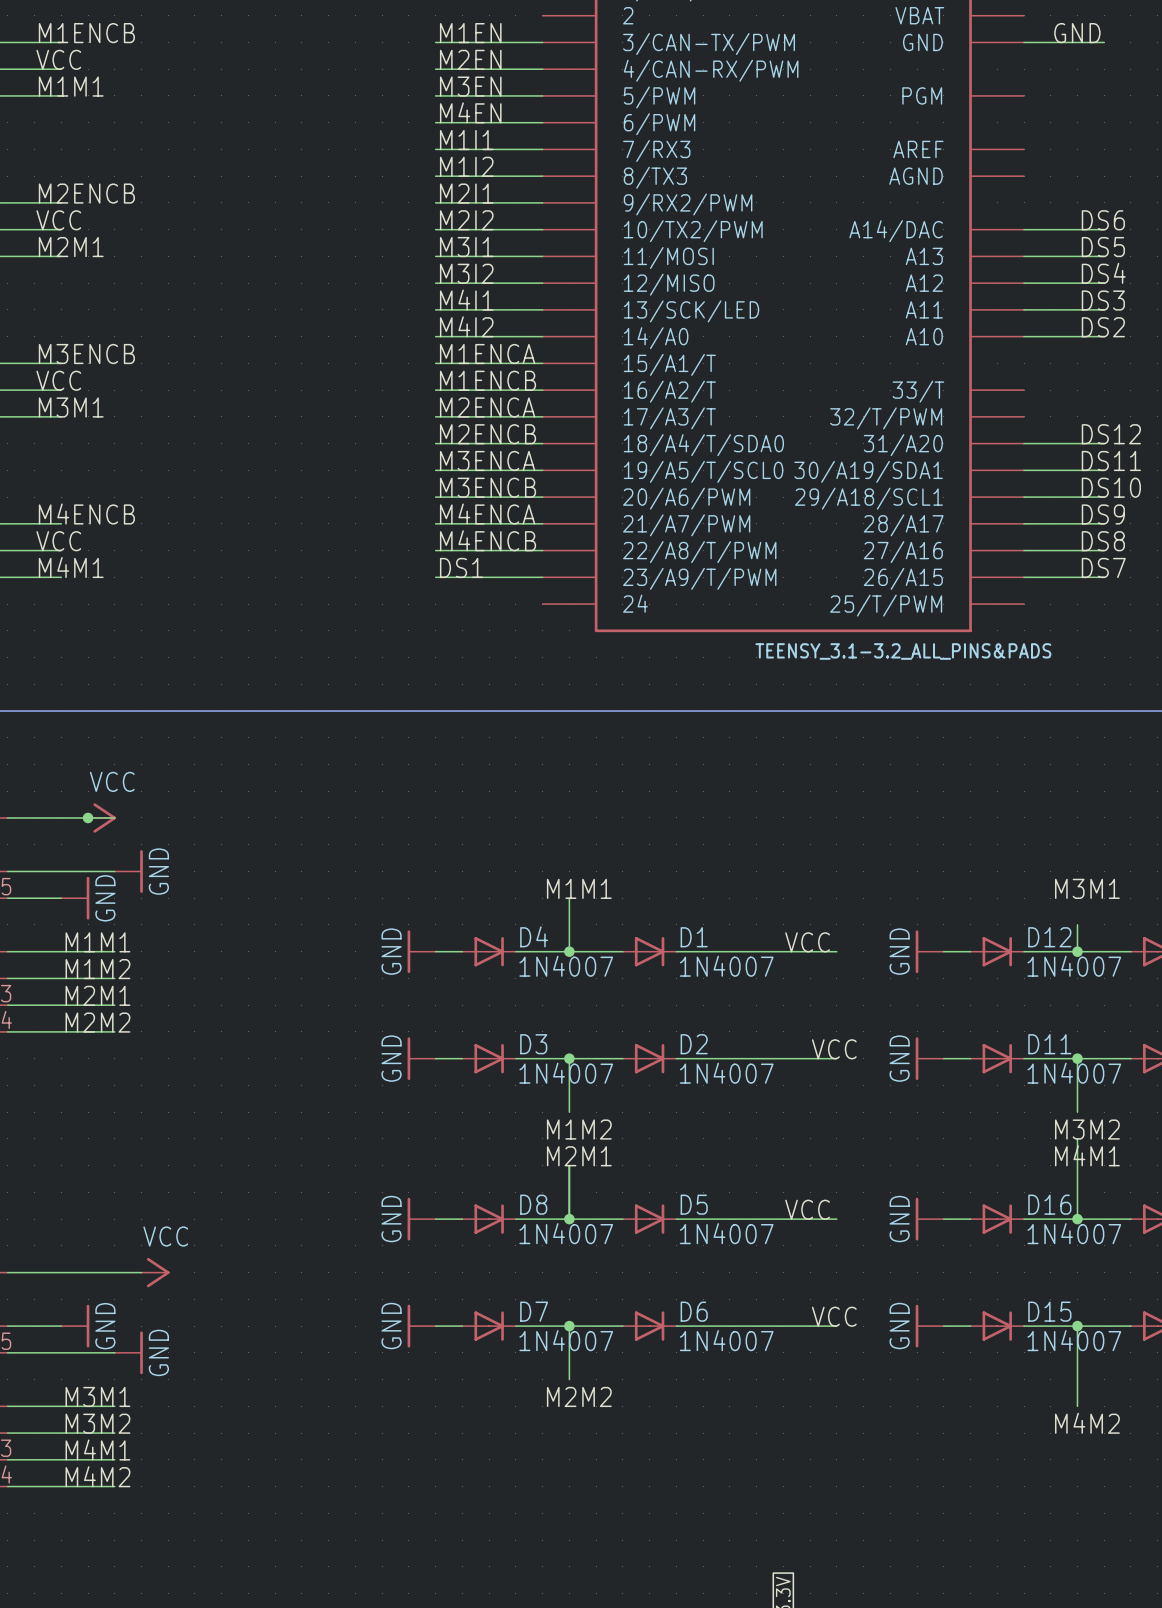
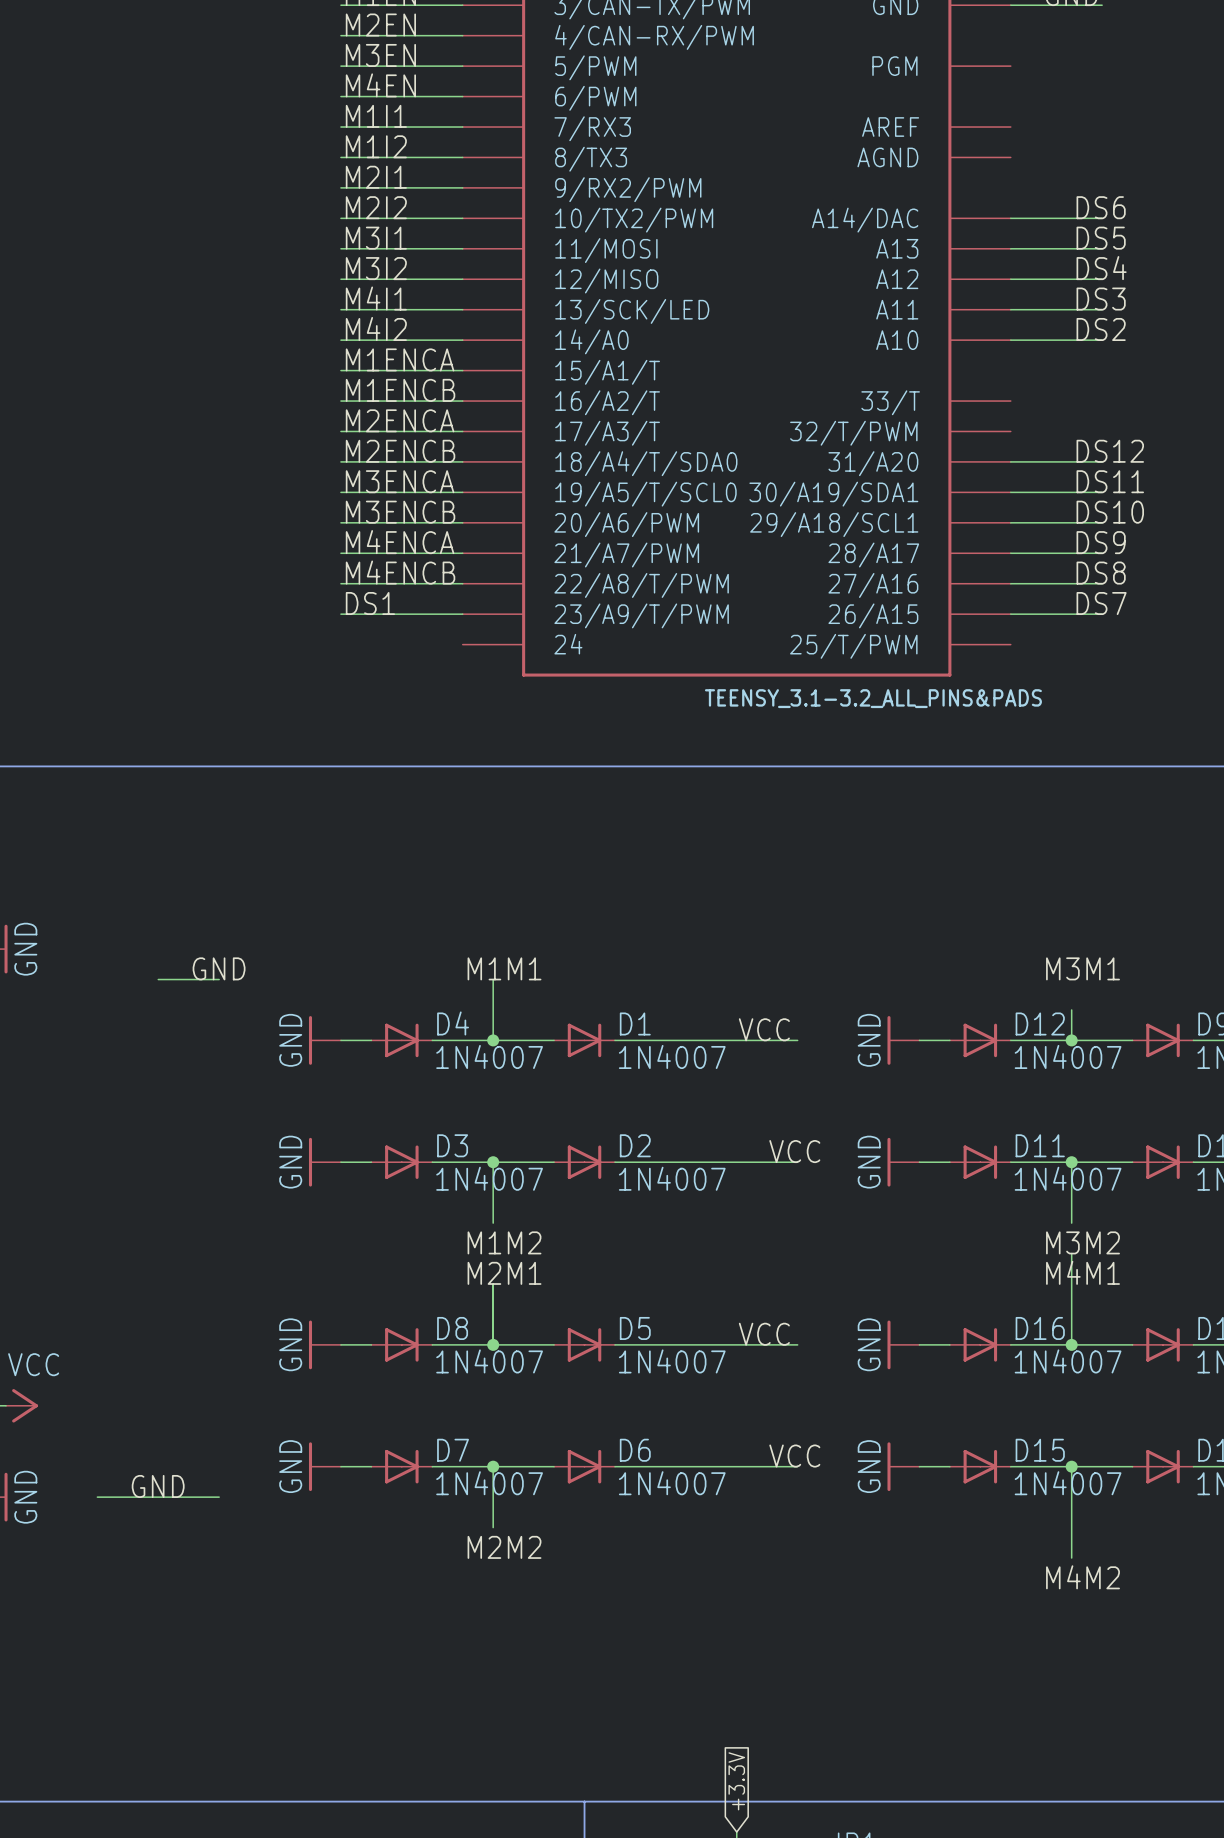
label: none -> GND (219, 968)
wire: none -> (158, 979) (219, 979)
label: none -> GND (158, 1486)
wire: none -> (97, 1497) (219, 1497)

